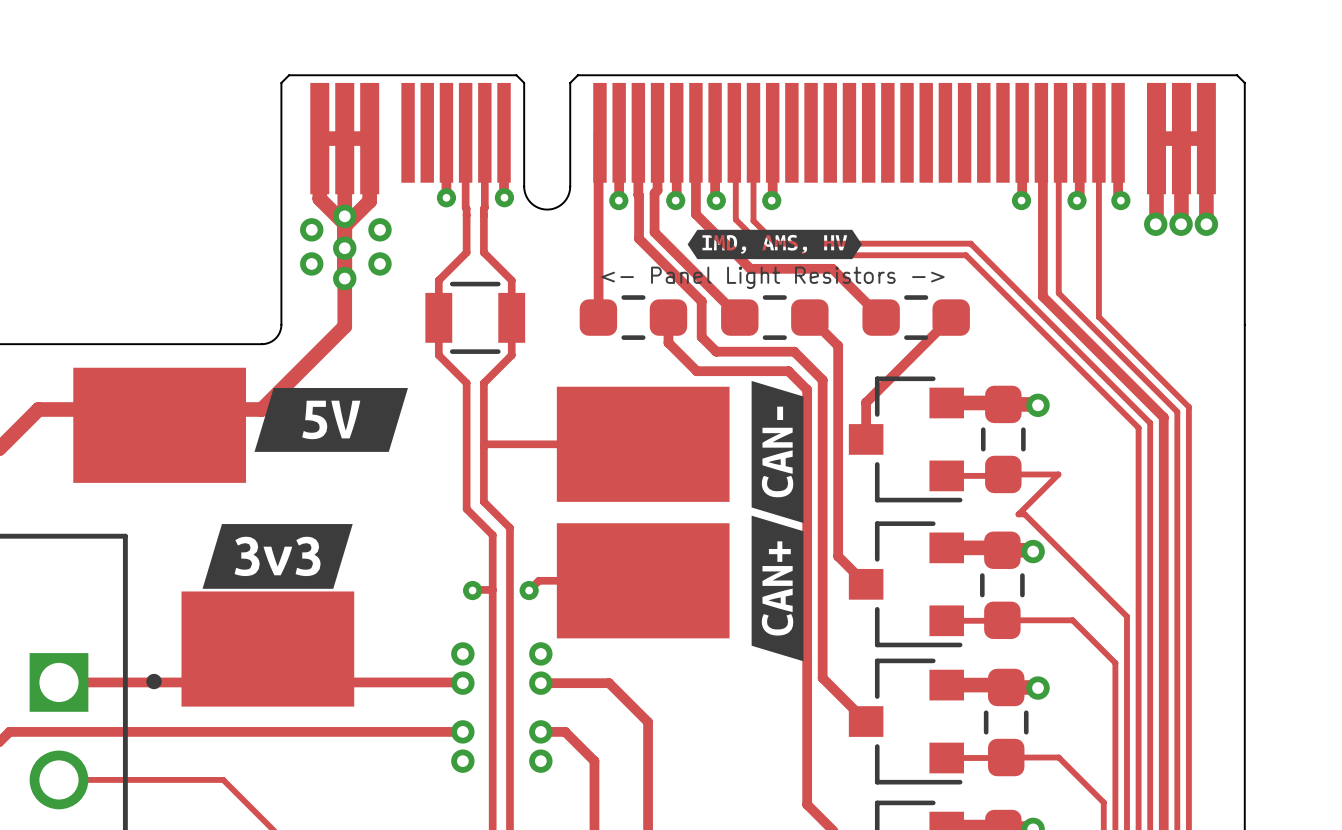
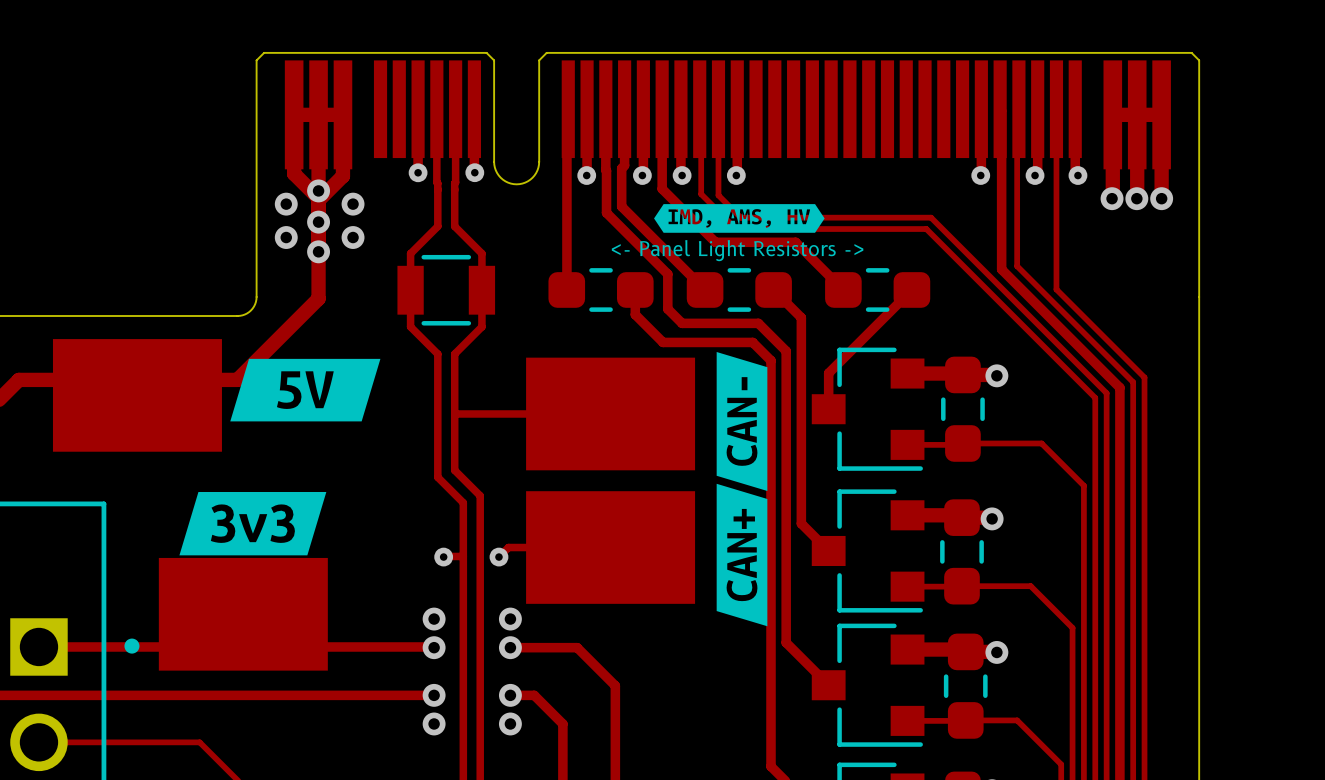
track: (1058, 474) (1018, 514) (1024, 514) (1126, 616) -> (1016, 443) (1041, 443) (1083, 485) (1083, 582)

